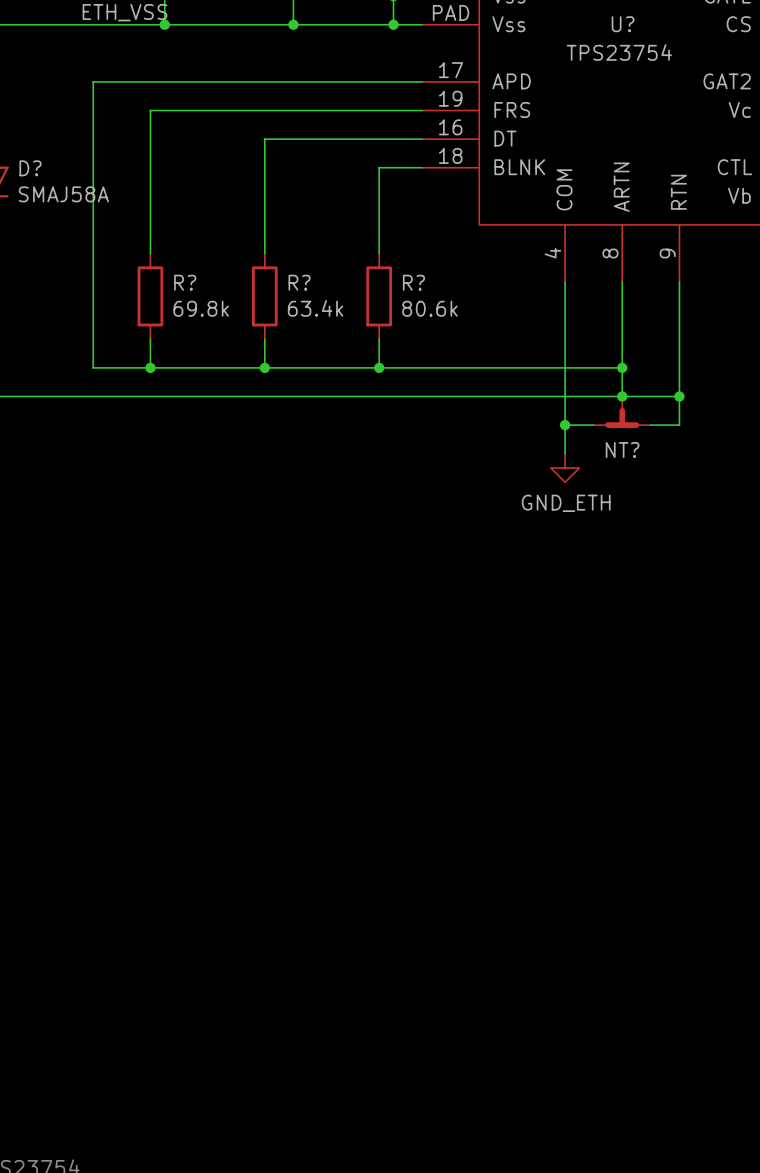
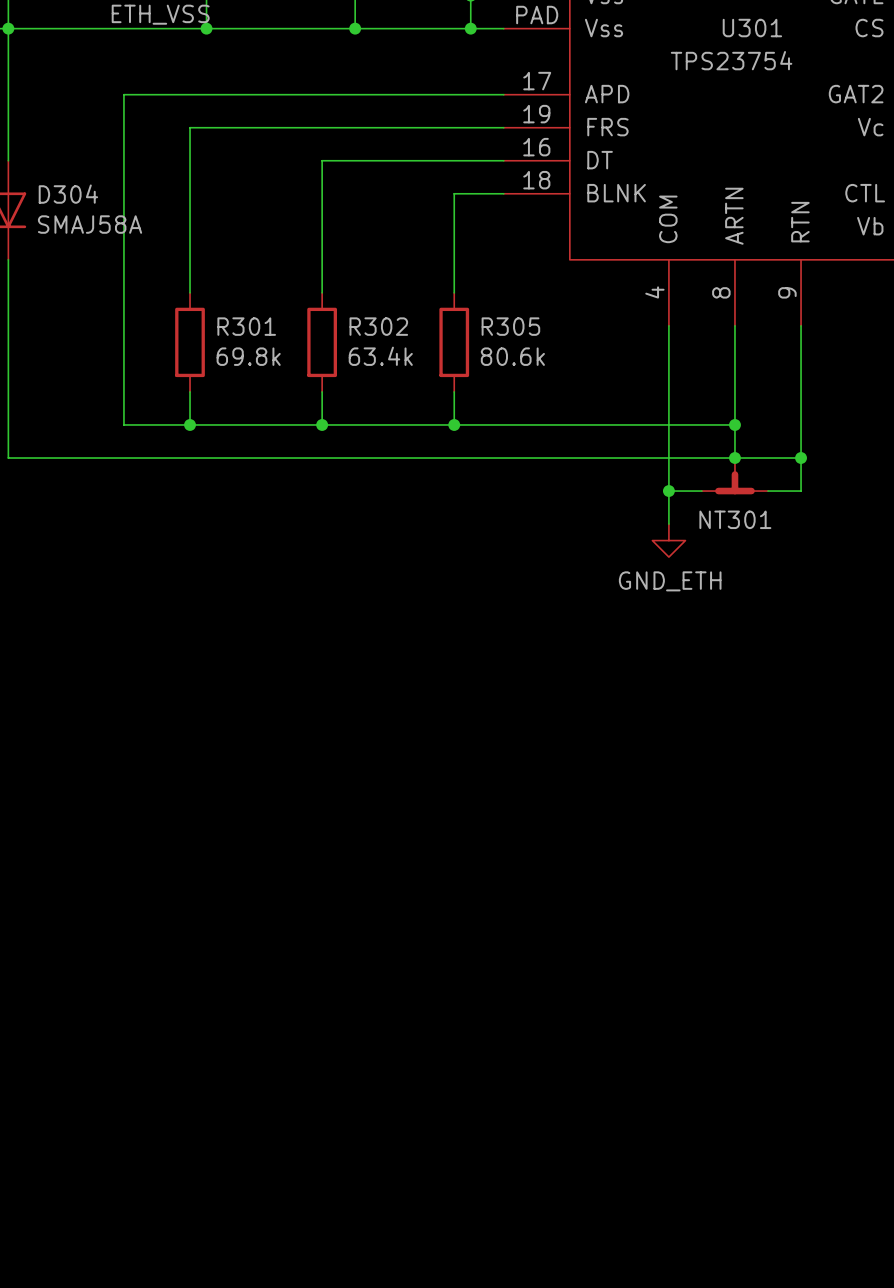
U? name: U? (623, 24) -> U301 (752, 28)
D? name: D? (30, 168) -> D304 (68, 194)
R? name: R? (185, 282) -> R301 (246, 326)
R? name: R? (299, 282) -> R302 (378, 326)
R? name: R? (413, 282) -> R305 (510, 326)
NT? name: NT? (622, 450) -> NT301 (735, 519)

